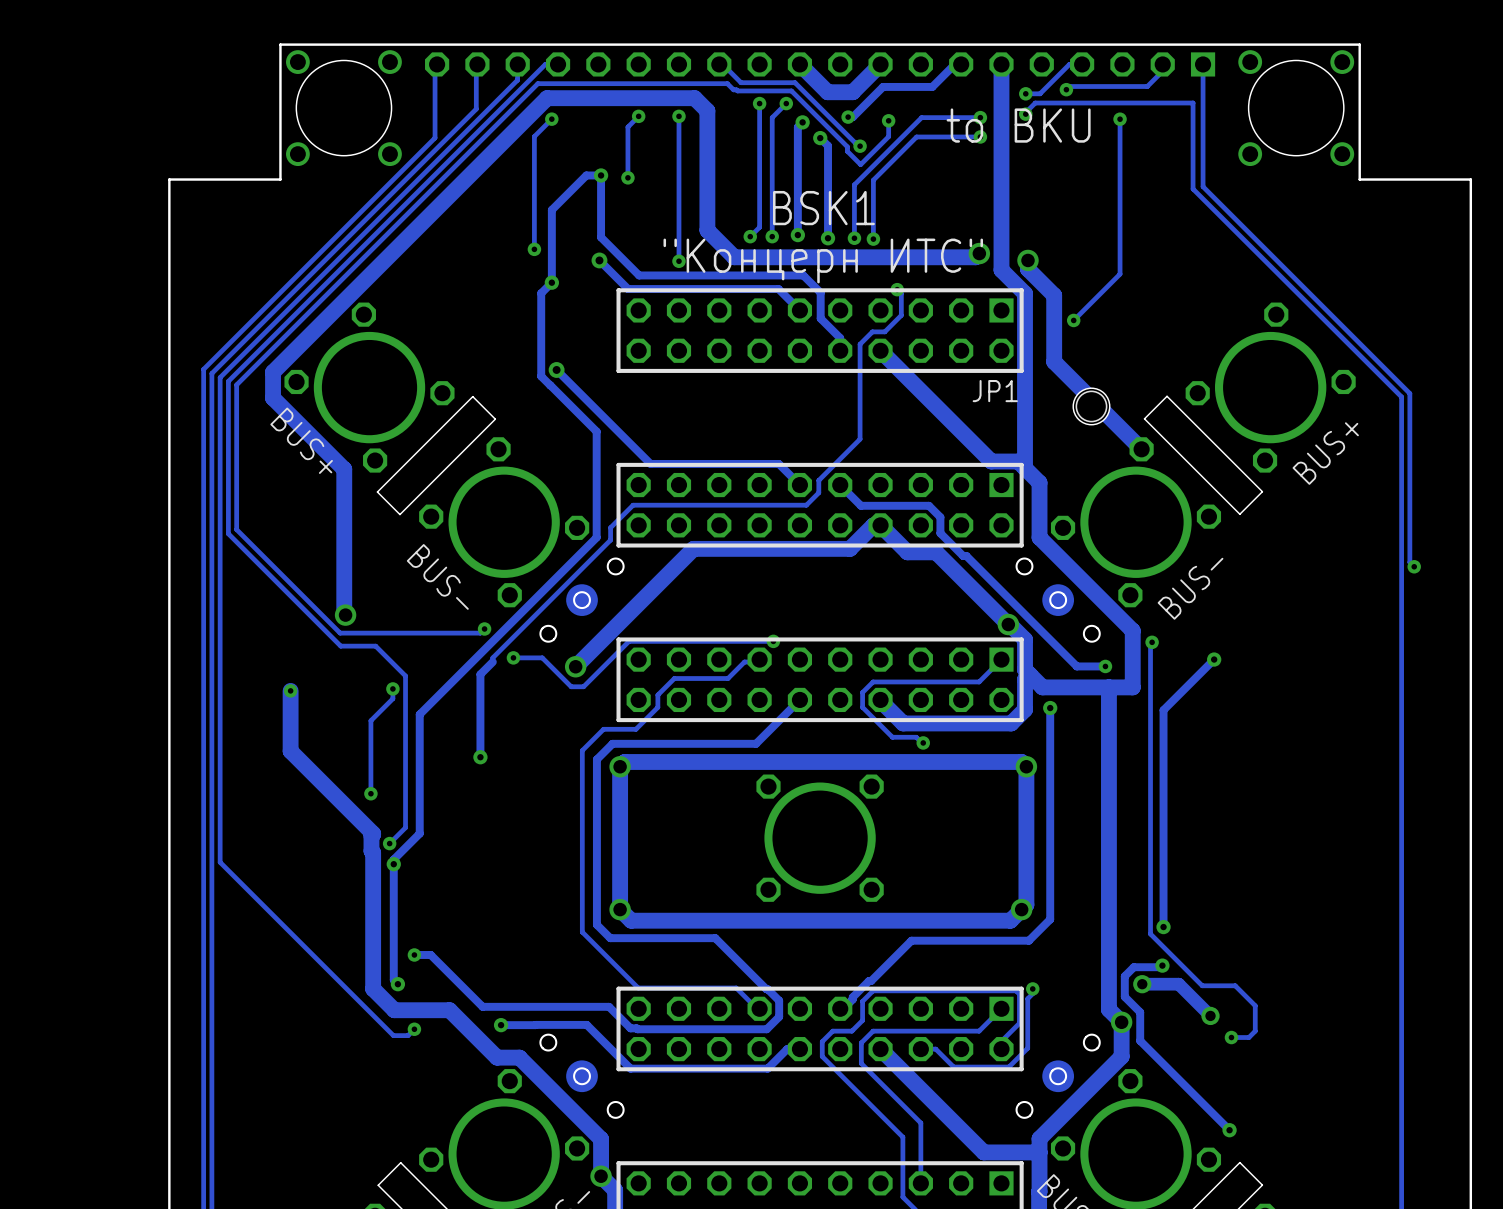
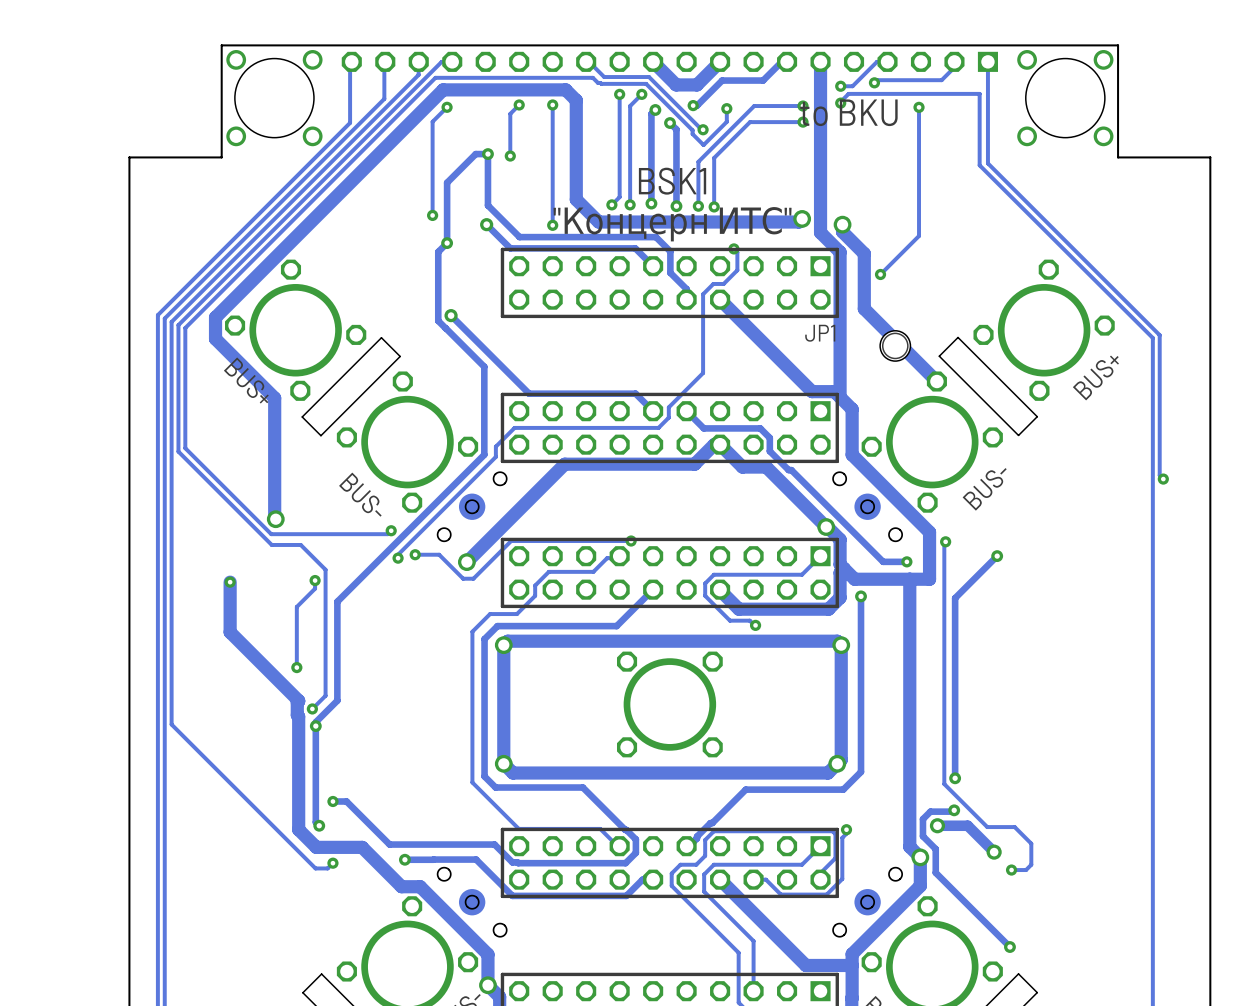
track: (492, 662) (480, 674) (480, 757) -> none
via: none -> (398, 558)
via: (480, 757) -> none

